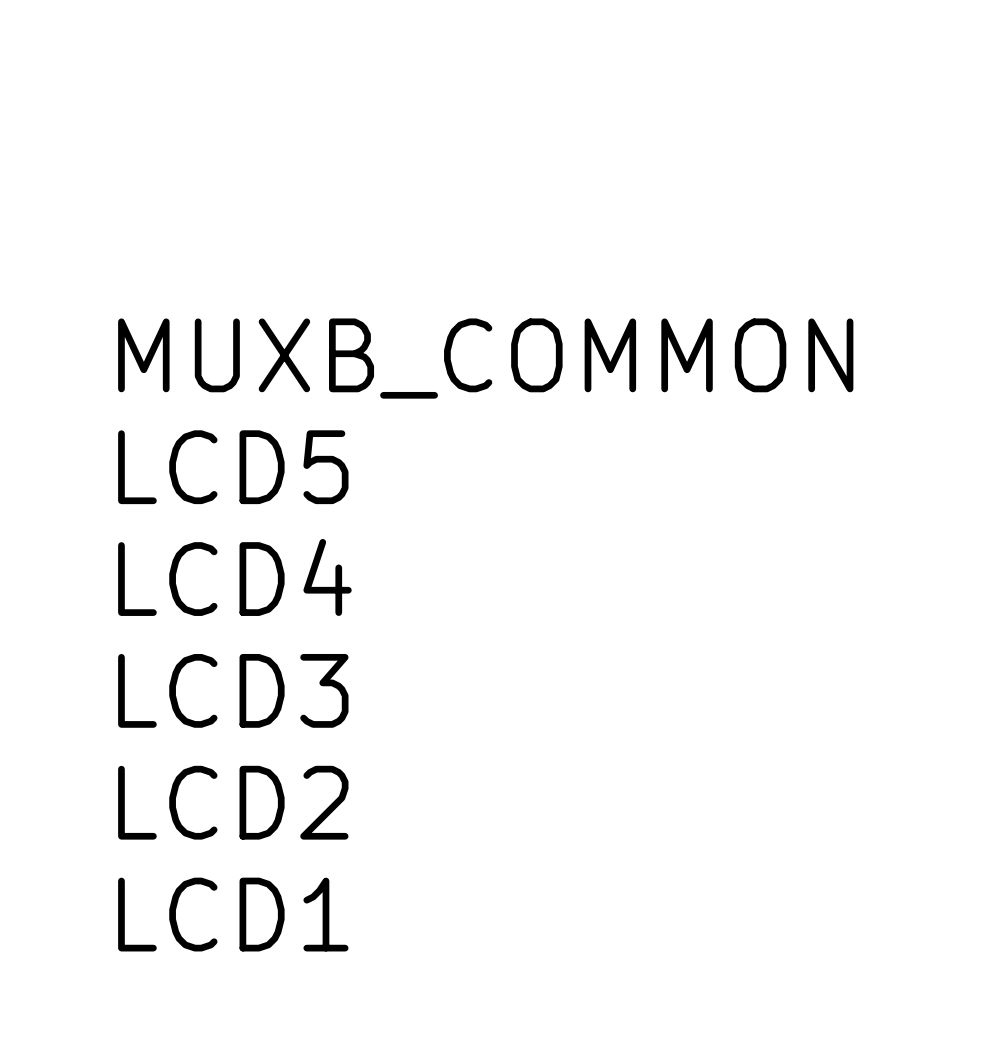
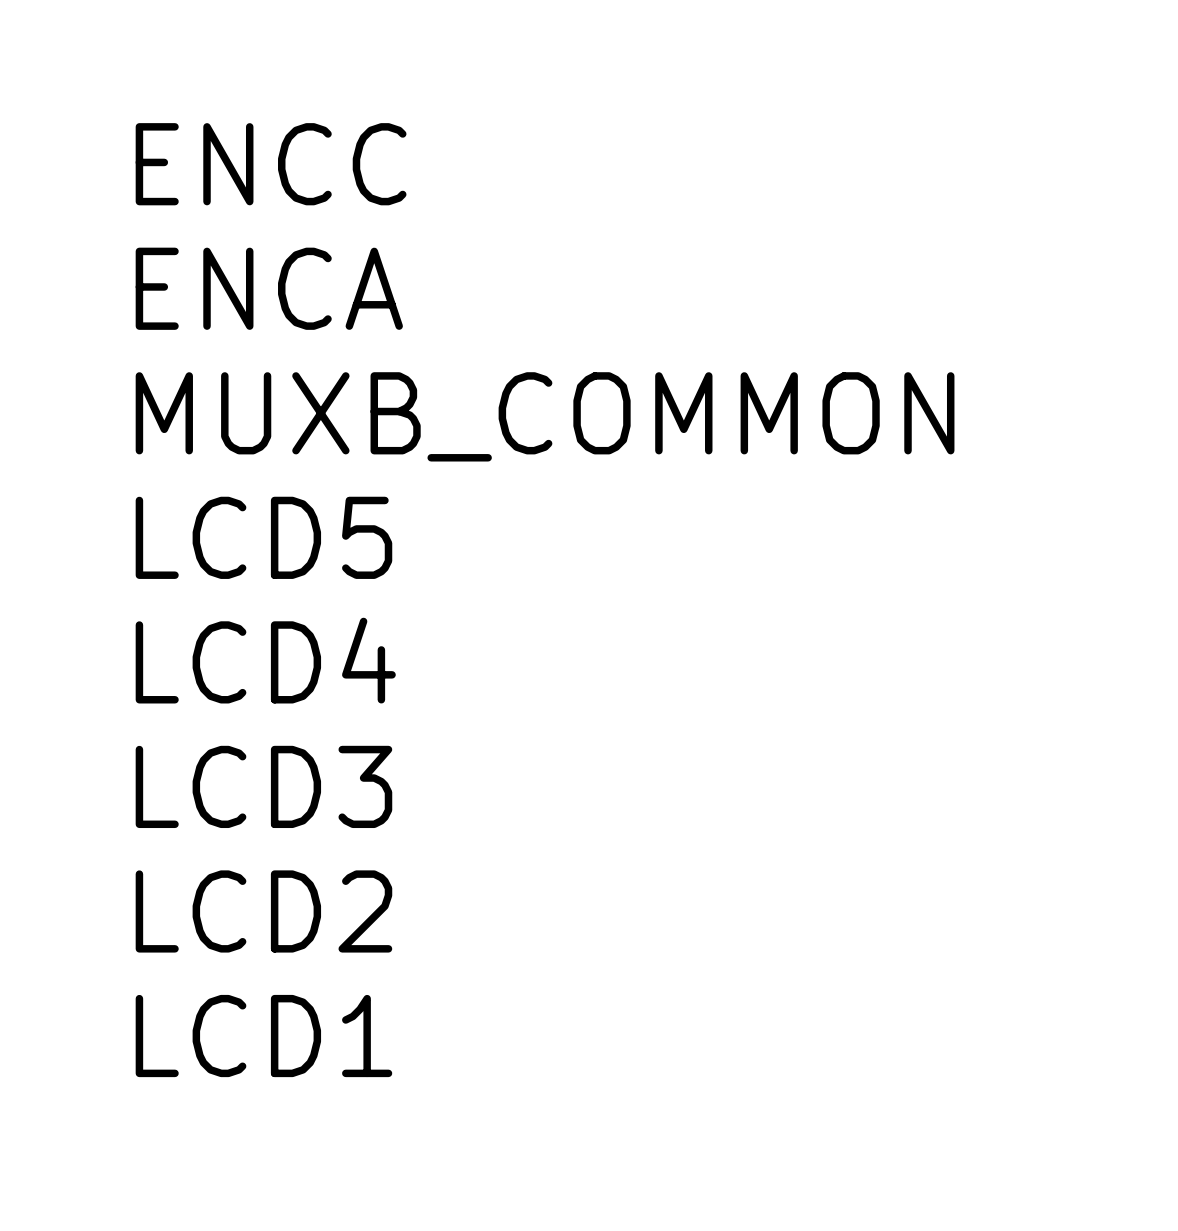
label: none -> ENCC (271, 164)
label: none -> ENCA (269, 288)

